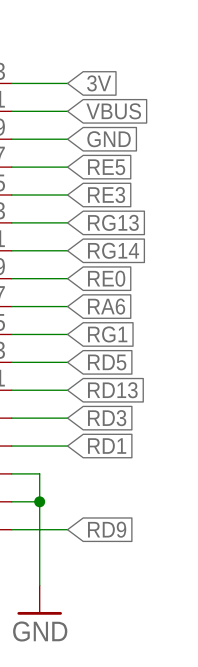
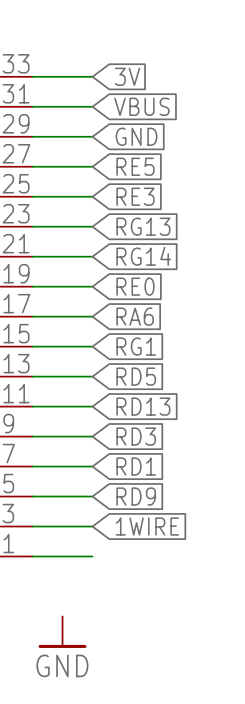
wire: (39, 473) (39, 585) -> (62, 496) (92, 496)
wire: none -> (62, 526) (92, 526)
junction: (39, 501) -> none
global label: none -> 1WIRE (147, 526)
global label position: RD9 (107, 529) -> RD9 (136, 496)

